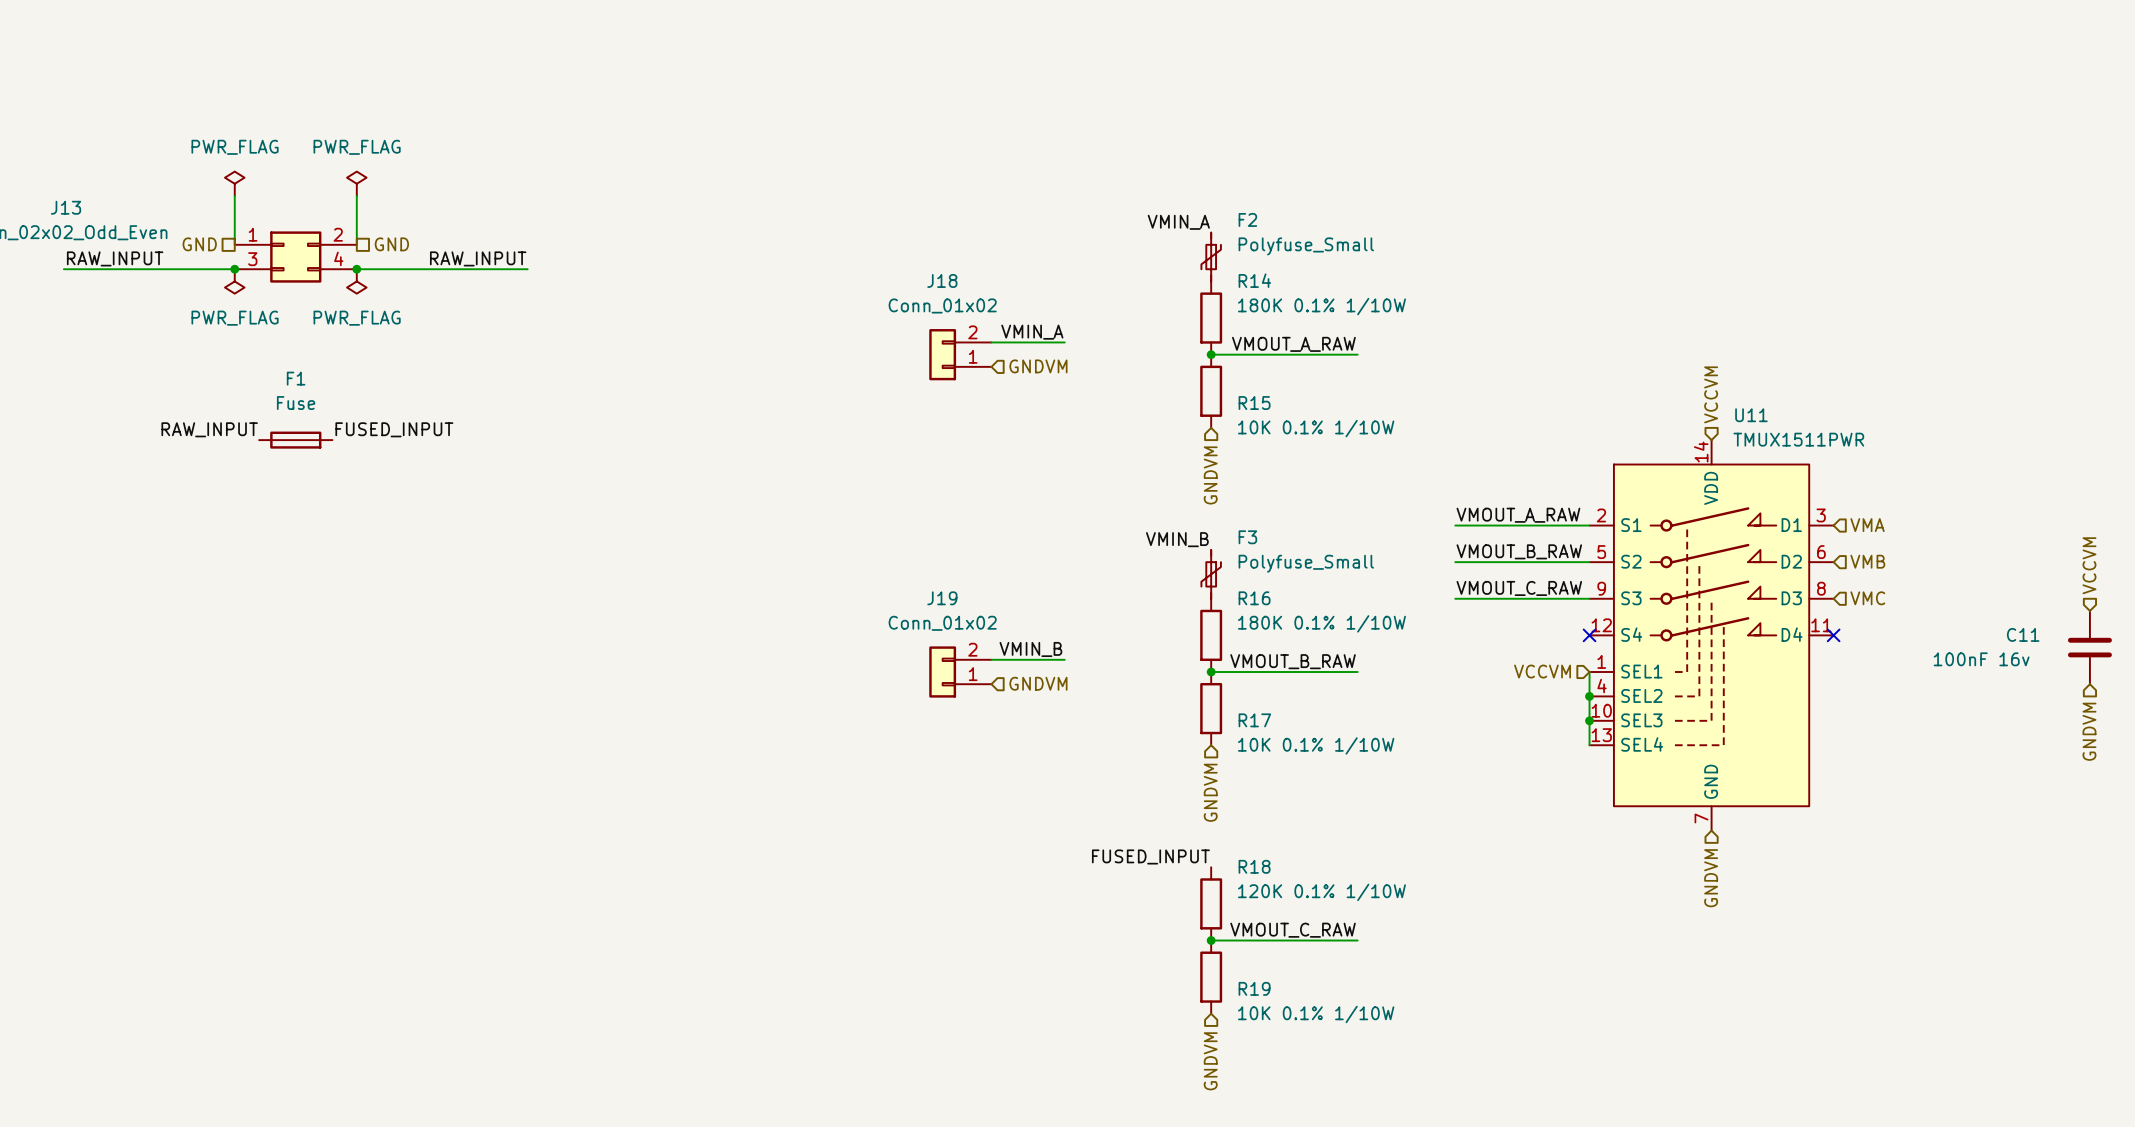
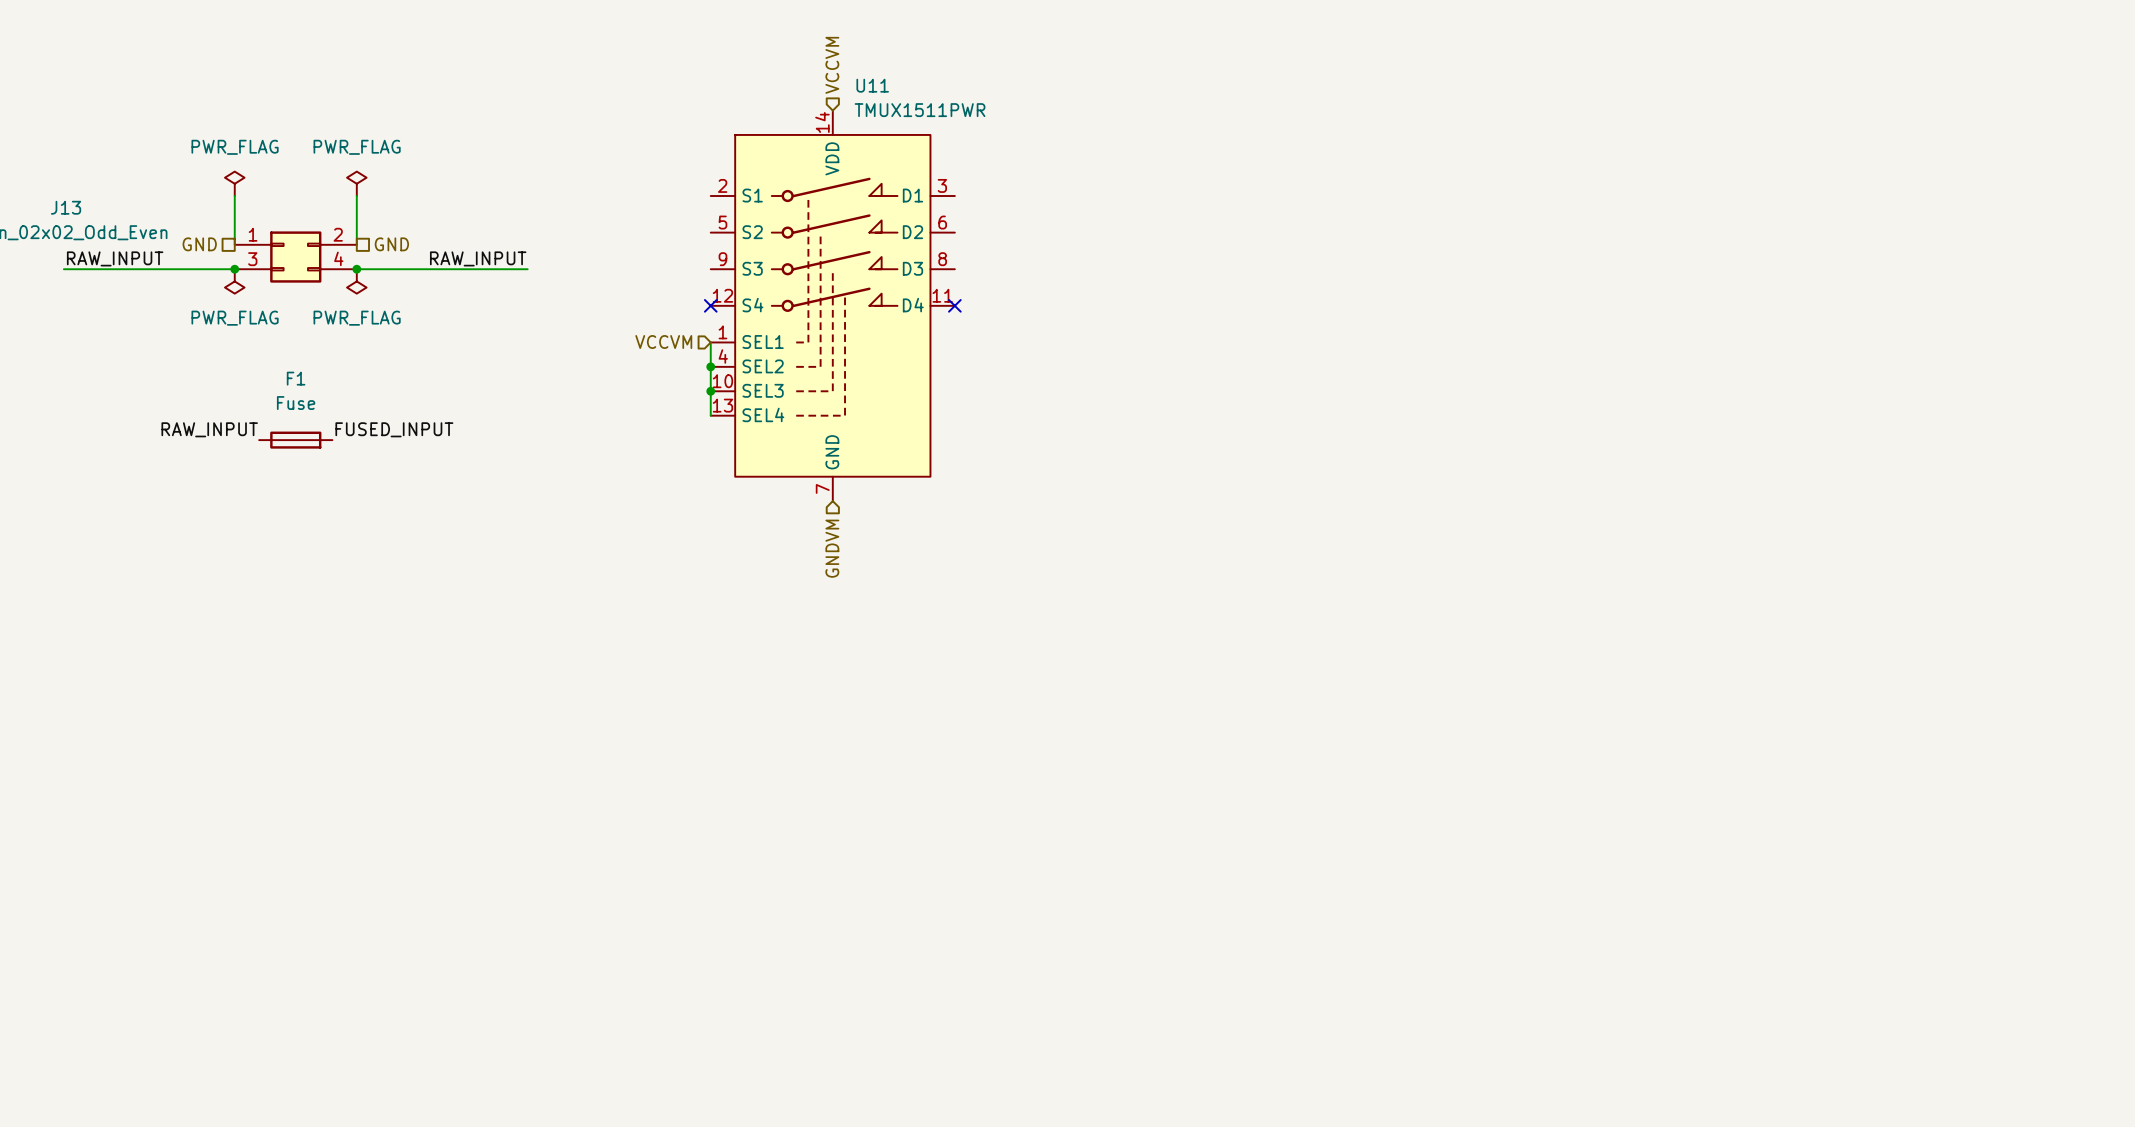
hierarchical label: none -> VCCVM (832, 65)
label: VMIN_A (1178, 222) -> none
F2: Polyfuse_Small (1211, 257) -> none
no-connect mark: none -> (710, 305)
no-connect mark: none -> (954, 305)
R14: 180K 0.1% 1/10W (1211, 318) -> none
label: VMIN_A (1032, 332) -> none
hierarchical label: none -> VCCVM (663, 342)
wire: none -> (710, 342) (710, 415)
wire: (991, 342) (1064, 342) -> none
label: VMOUT_A_RAW (1293, 344) -> none
J18: Conn_01x02 (960, 354) -> none
wire: (1211, 354) (1357, 354) -> none
junction: (1211, 354) -> none
junction: none -> (710, 366)
hierarchical label: GNDVM (1038, 366) -> none
junction: none -> (710, 391)
R15: 10K 0.1% 1/10W (1211, 391) -> none
hierarchical label: VCCVM (1711, 394) -> none
hierarchical label: GNDVM (1210, 475) -> none
label: VMOUT_A_RAW (1518, 515) -> none
wire: (1455, 525) (1589, 525) -> none
hierarchical label: VMA (1867, 525) -> none
label: VMIN_B (1177, 539) -> none
hierarchical label: none -> GNDVM (832, 548)
label: VMOUT_B_RAW (1519, 551) -> none
hierarchical label: VMB (1867, 561) -> none
wire: (1455, 562) (1589, 562) -> none
hierarchical label: VCCVM (2089, 565) -> none
F3: Polyfuse_Small (1211, 574) -> none
label: VMOUT_C_RAW (1519, 588) -> none
wire: (1455, 598) (1589, 598) -> none
hierarchical label: VMC (1867, 598) -> none
R16: 180K 0.1% 1/10W (1211, 635) -> none
no-connect mark: (1589, 635) -> none
U11 position: (1711, 635) -> (832, 305)
no-connect mark: (1833, 635) -> none
C11: 100nF 16v (2089, 647) -> none
label: VMIN_B (1030, 649) -> none
wire: (991, 659) (1064, 659) -> none
label: VMOUT_B_RAW (1293, 661) -> none
hierarchical label: VCCVM (1542, 671) -> none
J19: Conn_01x02 (960, 672) -> none
wire: (1211, 672) (1357, 672) -> none
junction: (1211, 672) -> none
wire: (1589, 672) (1589, 745) -> none
hierarchical label: GNDVM (1038, 683) -> none
junction: (1589, 696) -> none
R17: 10K 0.1% 1/10W (1211, 708) -> none
junction: (1589, 720) -> none
hierarchical label: GNDVM (2089, 731) -> none
hierarchical label: GNDVM (1210, 792) -> none
label: FUSED_INPUT (1150, 856) -> none
hierarchical label: GNDVM (1711, 878) -> none
R18: 120K 0.1% 1/10W (1211, 903) -> none
label: VMOUT_C_RAW (1293, 930) -> none
wire: (1211, 940) (1357, 940) -> none
junction: (1211, 940) -> none
R19: 10K 0.1% 1/10W (1211, 977) -> none
hierarchical label: GNDVM (1210, 1061) -> none

